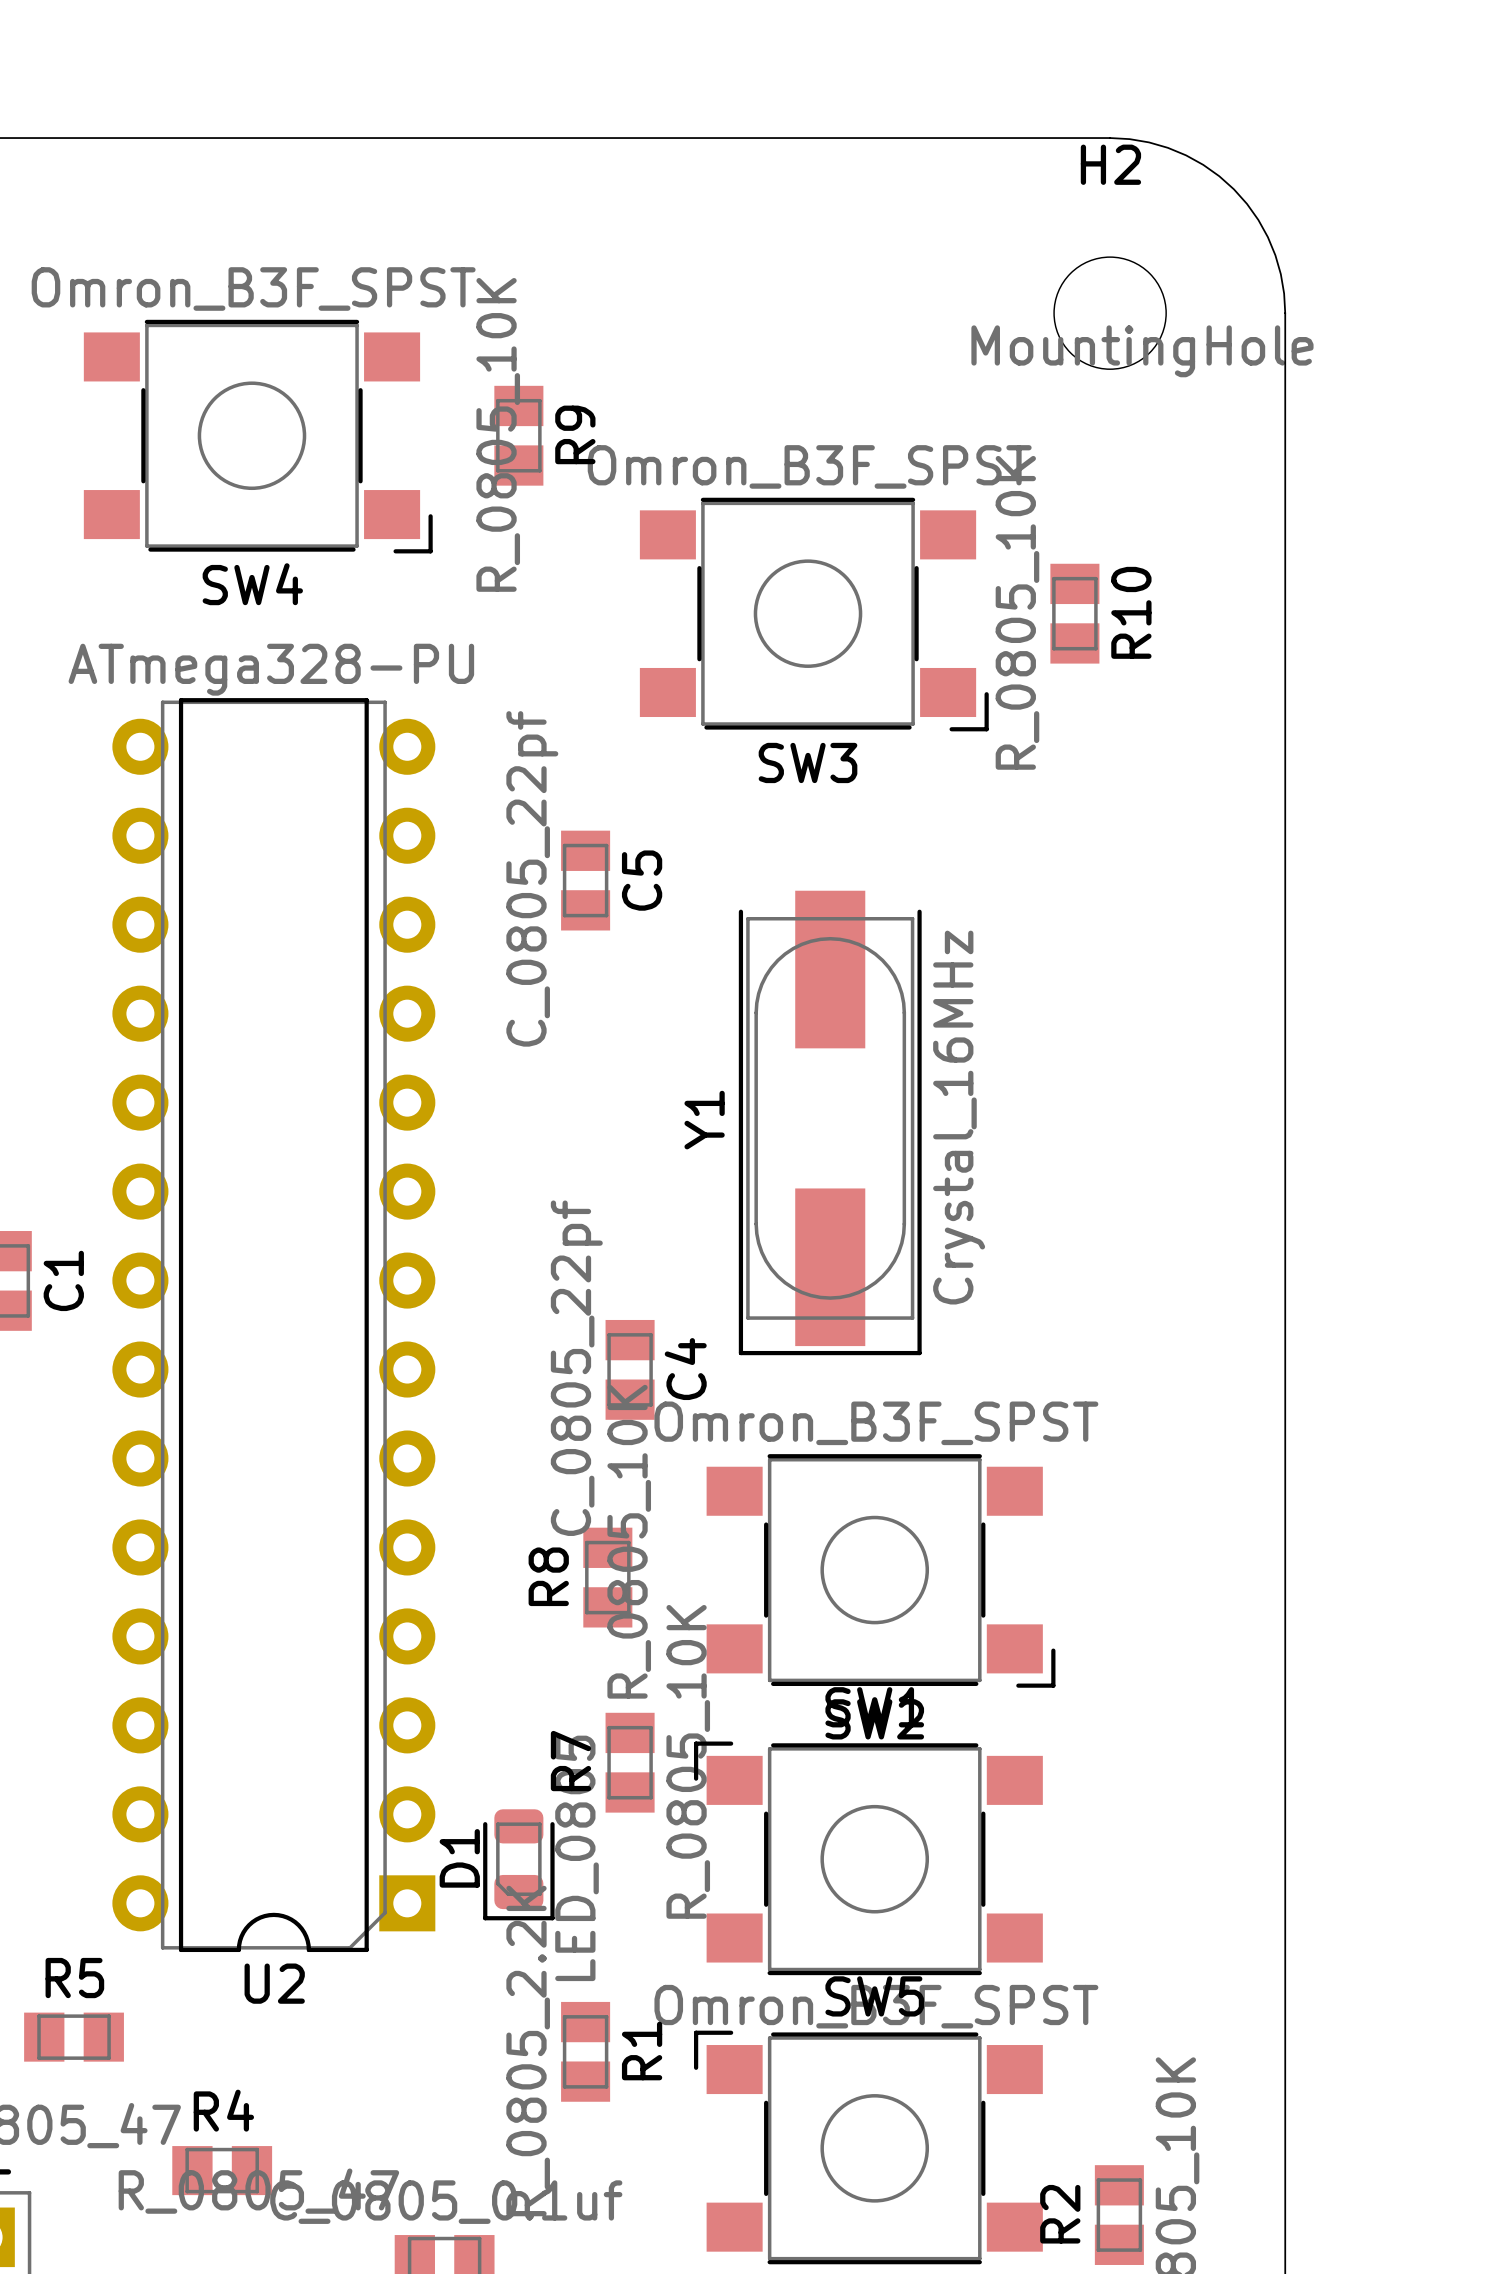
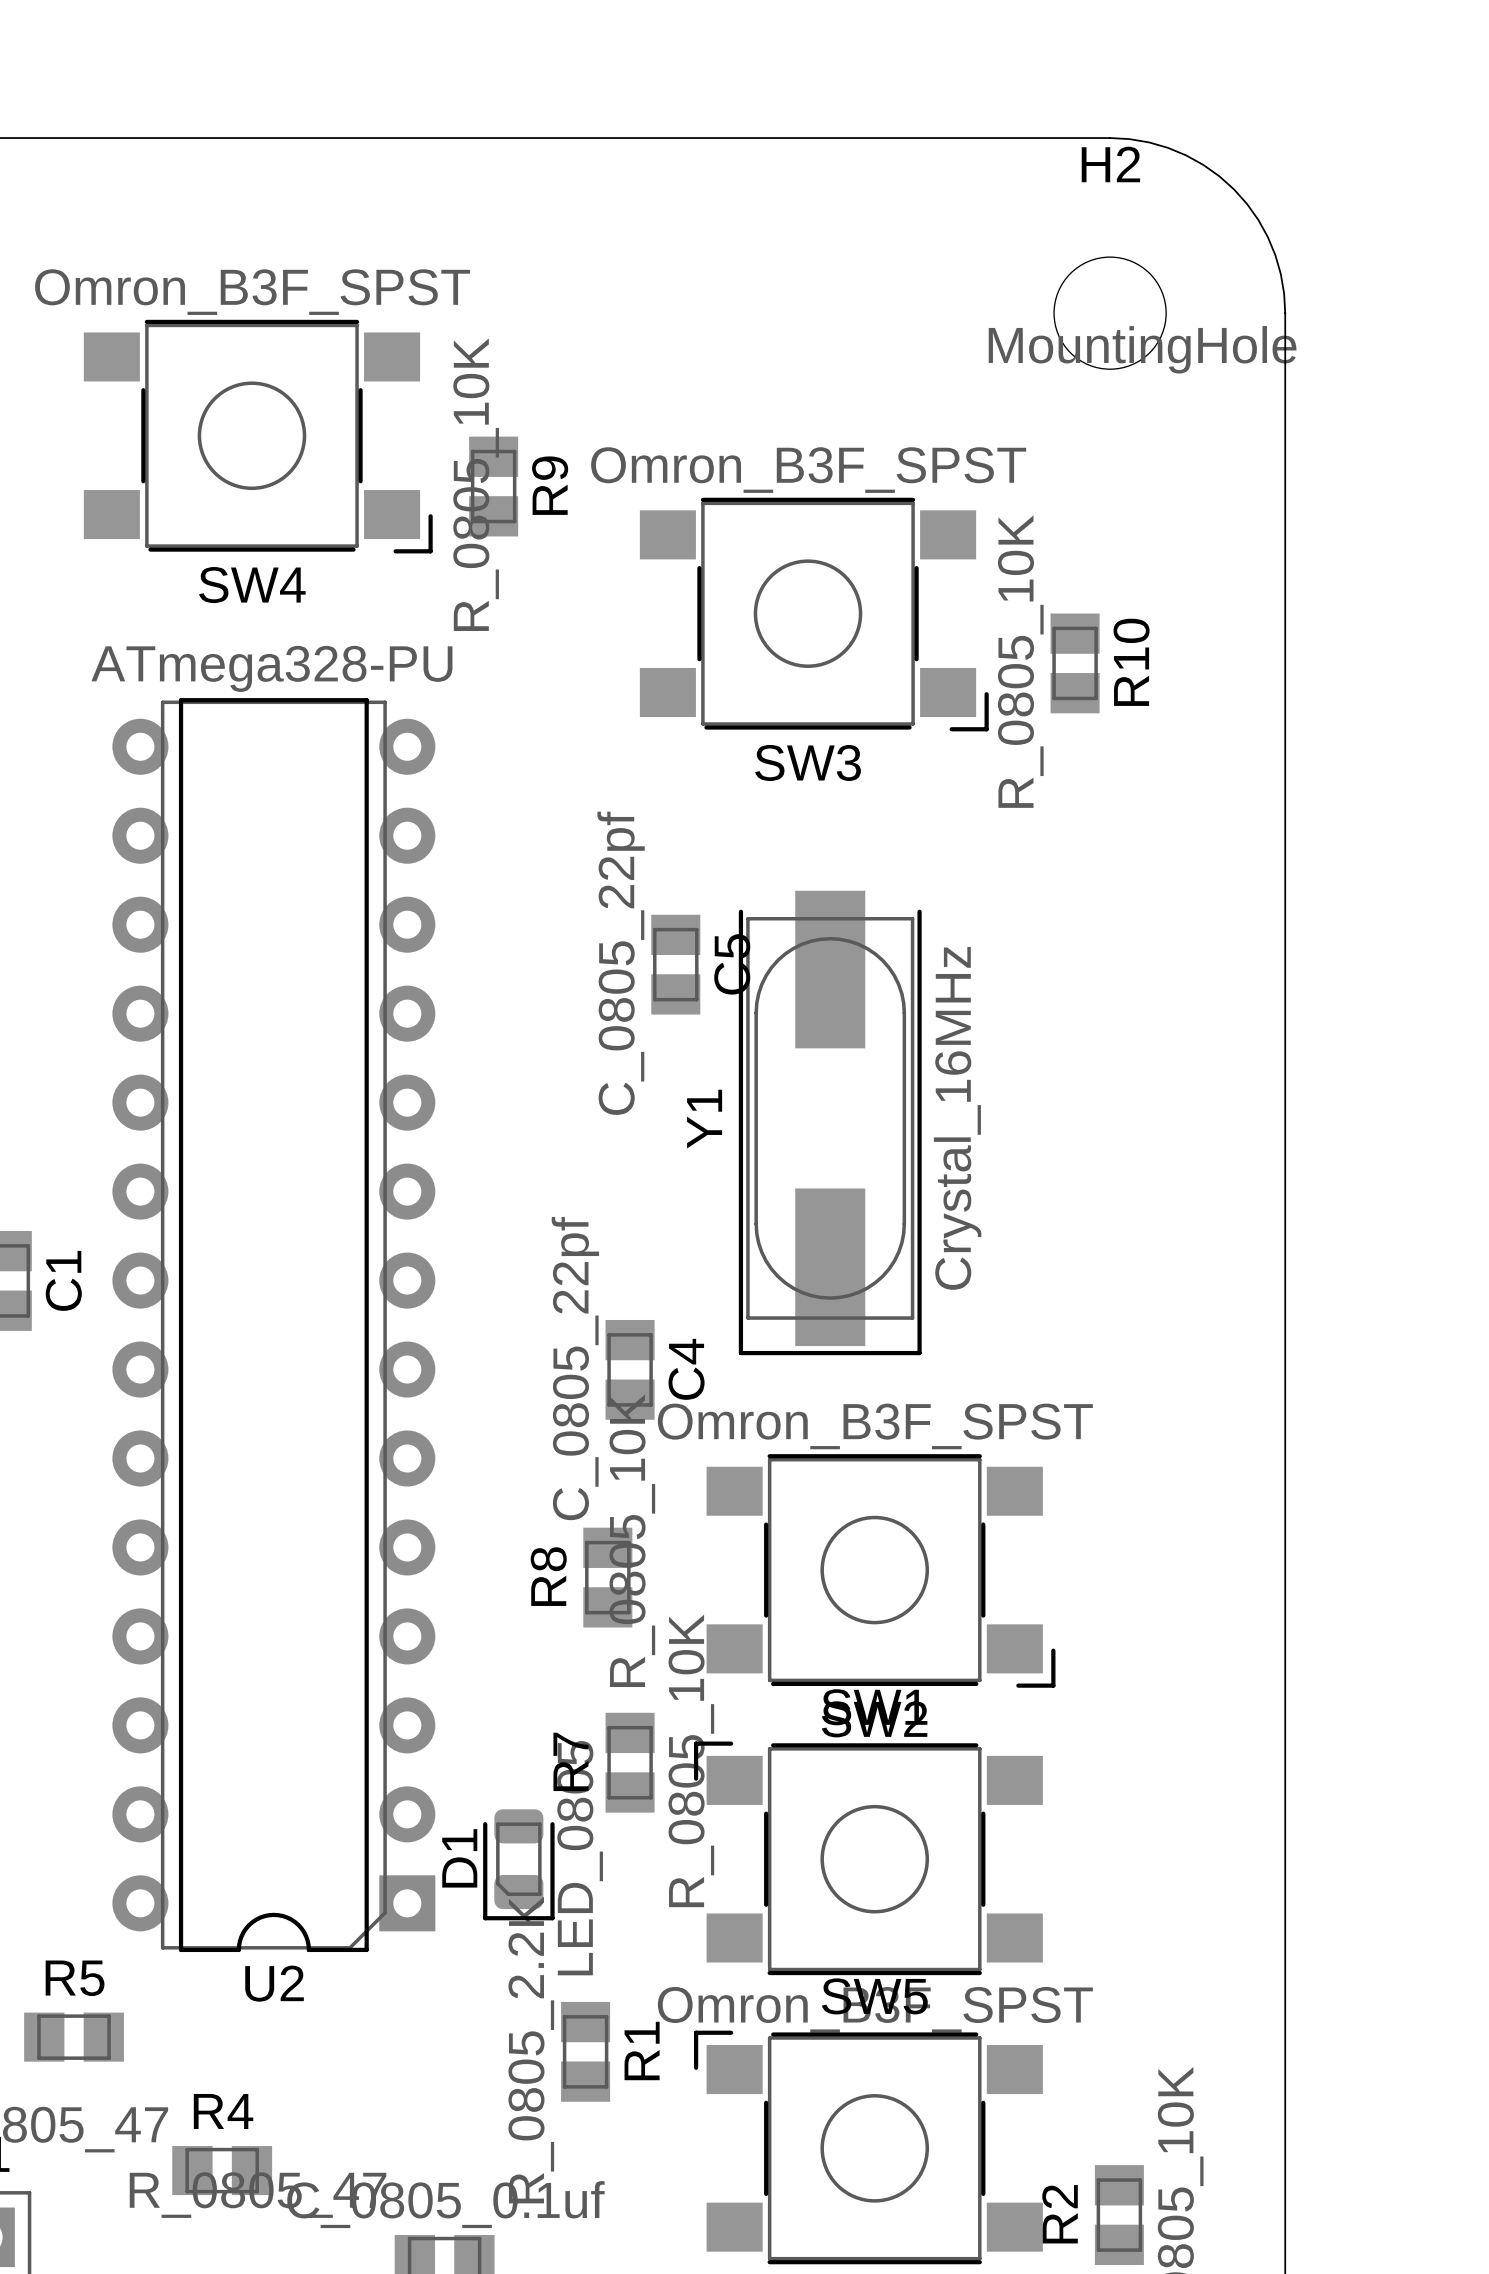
R9 position: (518, 435) -> (493, 486)
R10 position: (1074, 613) -> (1075, 663)
C5 position: (585, 880) -> (675, 964)

